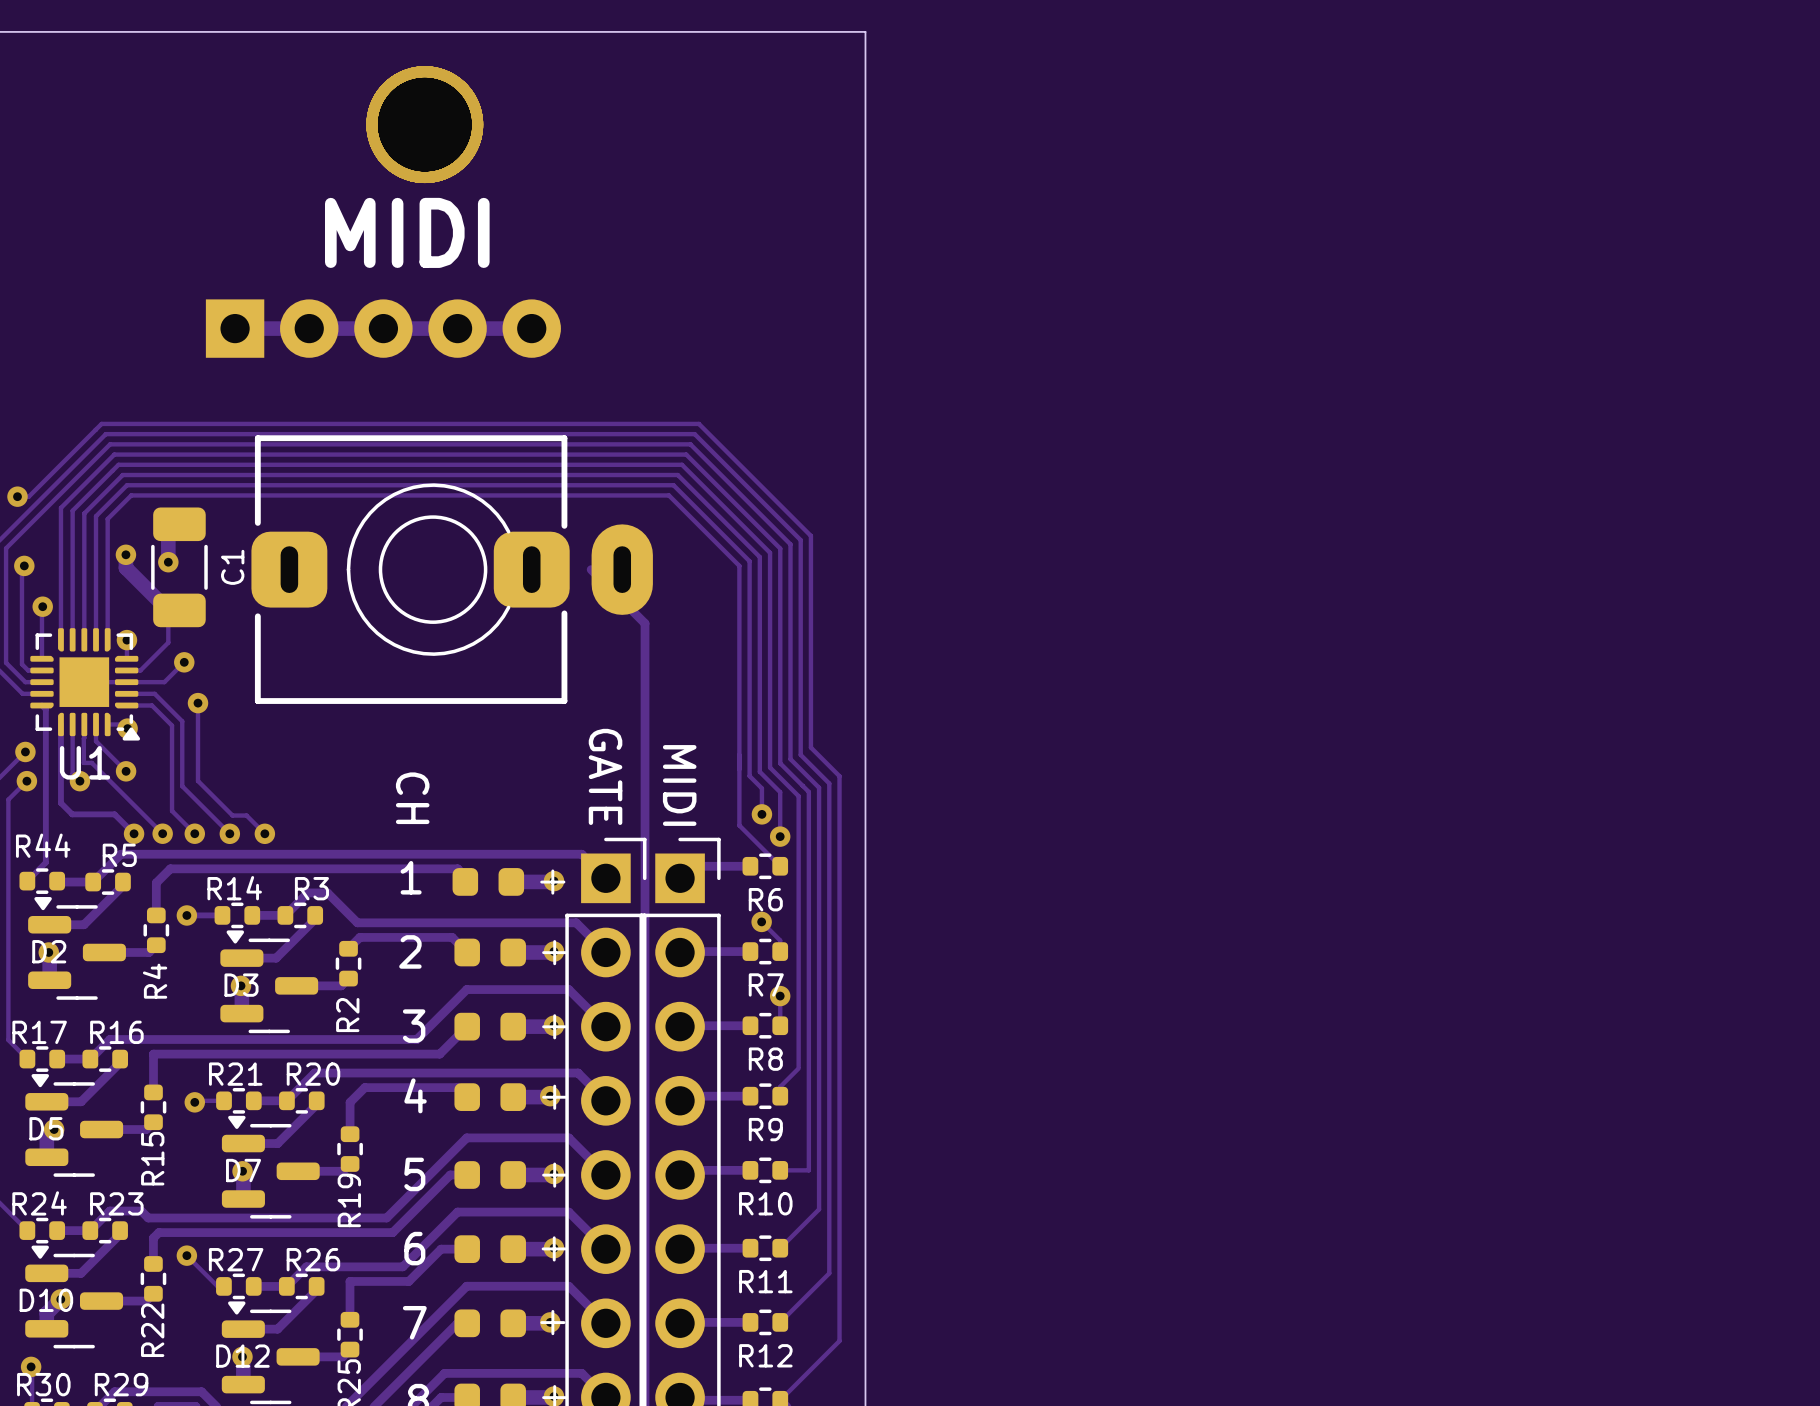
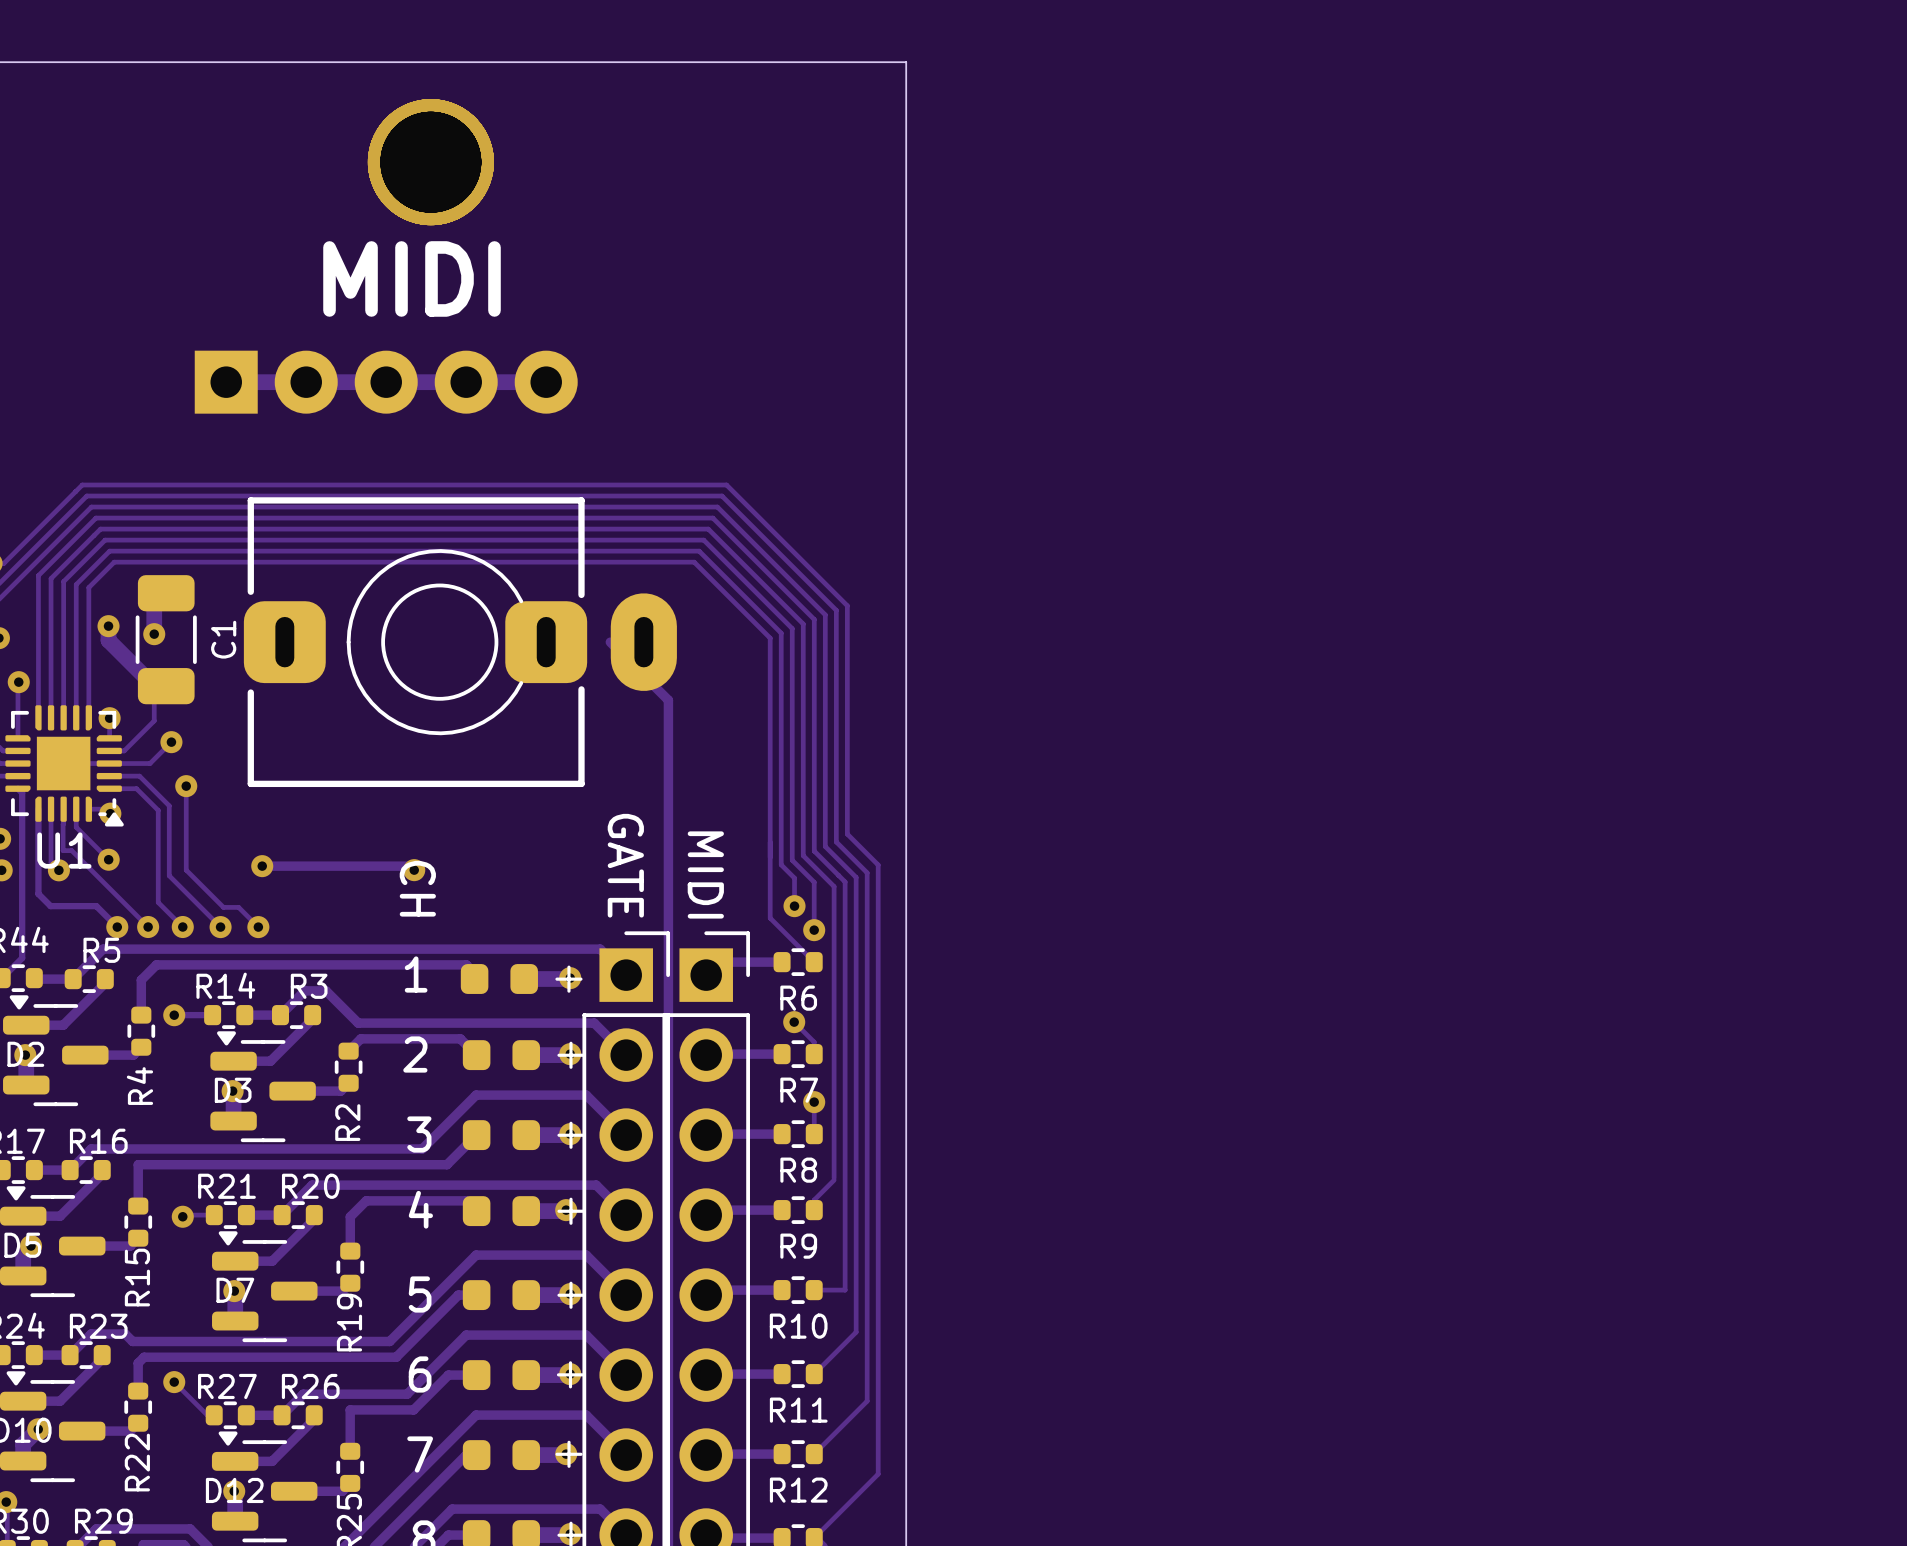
track: none -> (262, 866) (410, 866) (414, 870)
via: none -> (262, 866)
via: none -> (414, 870)

